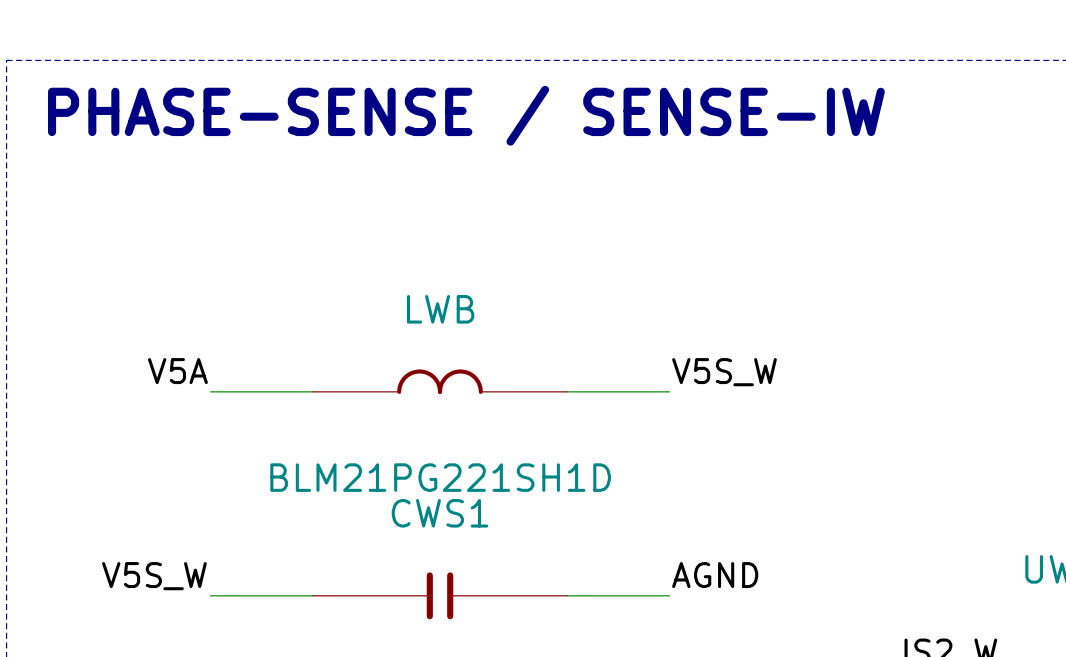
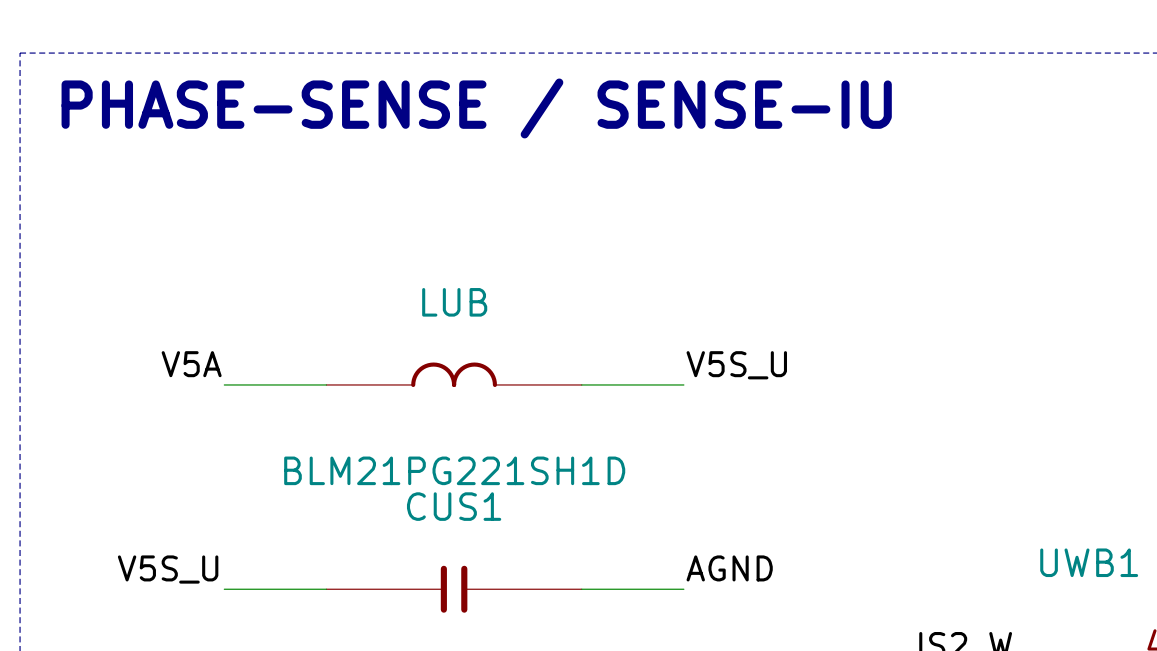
text: PHASE-SENSE / SENSE-IW (466, 115) -> PHASE-SENSE / SENSE-IU (476, 108)
LWB name: LWB (440, 309) -> LUB (454, 302)
label: V5S_W (724, 372) -> V5S_U (736, 365)
CWS1 name: CWS1 (440, 513) -> CUS1 (454, 506)
label: V5S_W (154, 576) -> V5S_U (168, 569)

